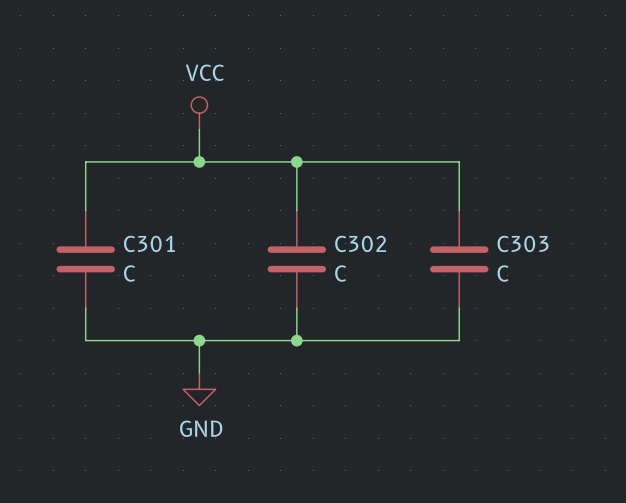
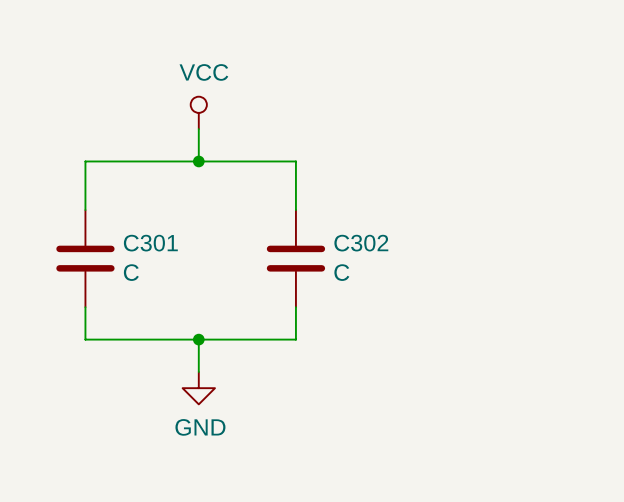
wire: (296, 161) (459, 161) (459, 210) -> none
junction: (296, 161) -> none
C303: C (459, 259) -> none
wire: (459, 308) (459, 340) (296, 340) -> none
junction: (296, 340) -> none

